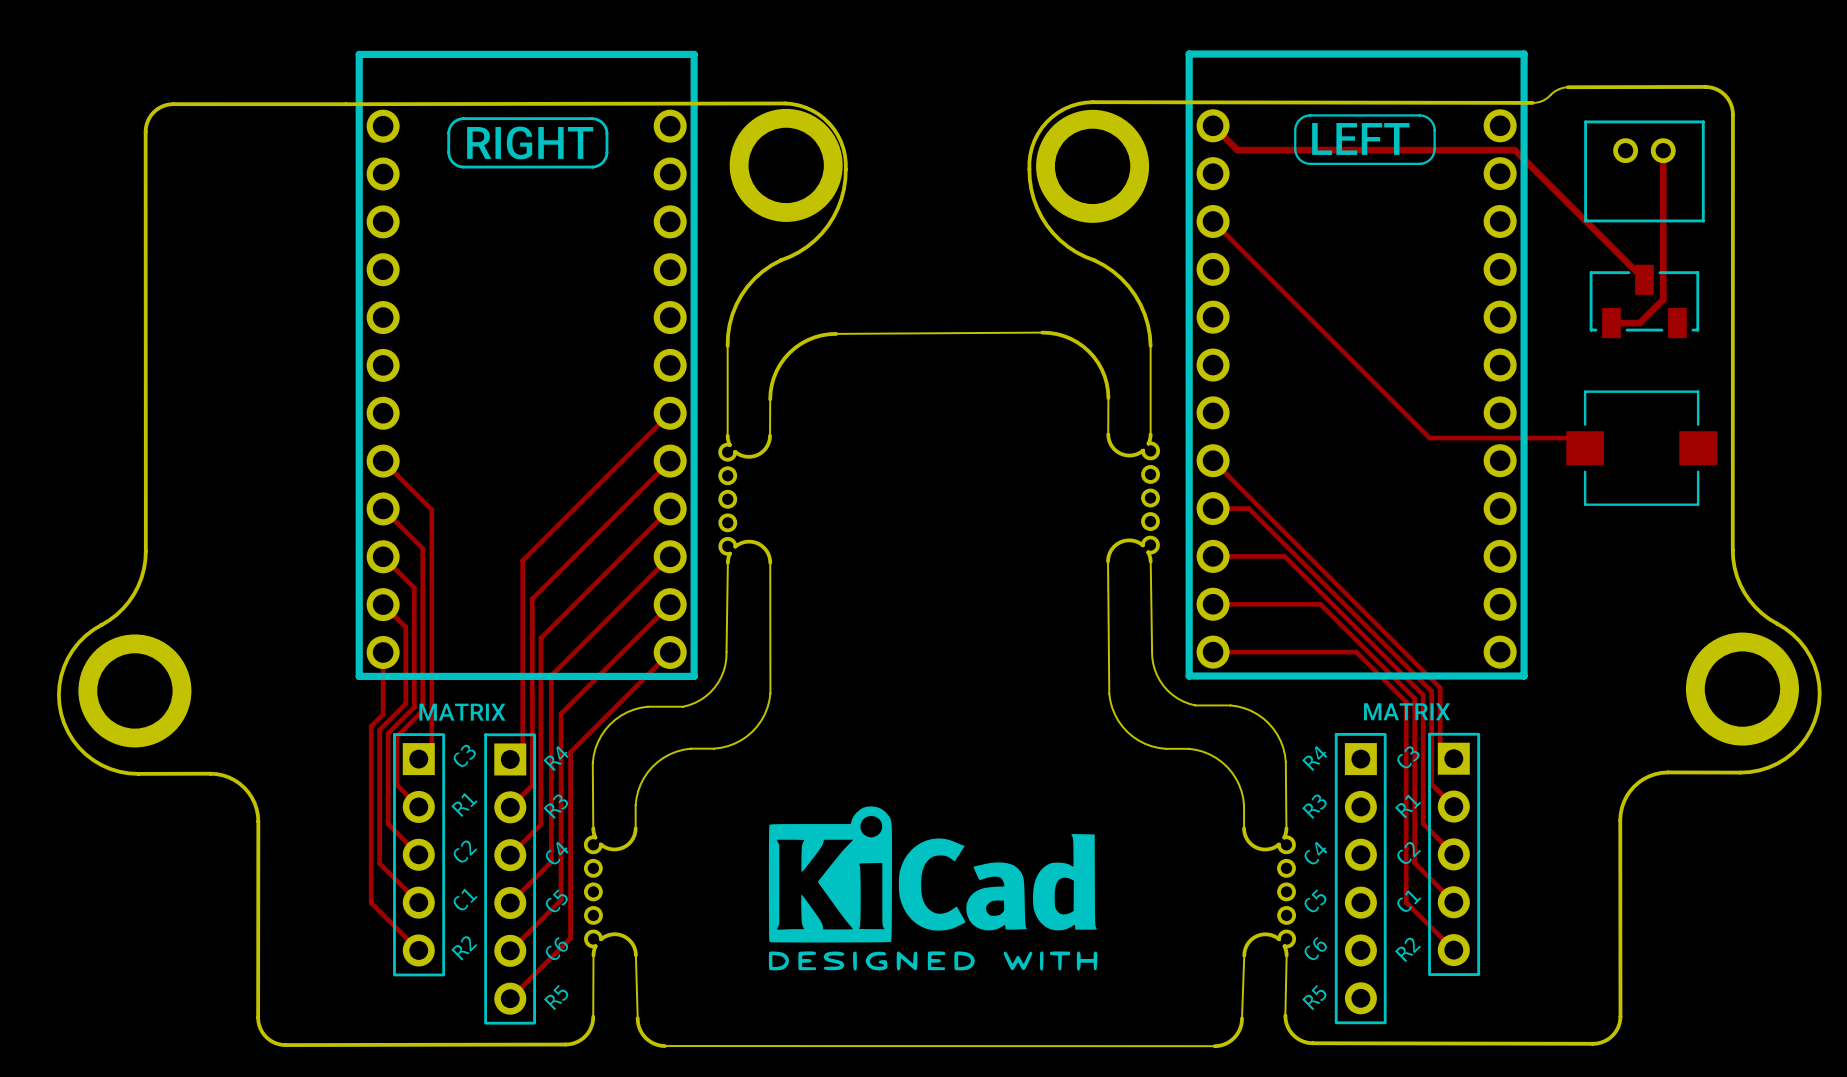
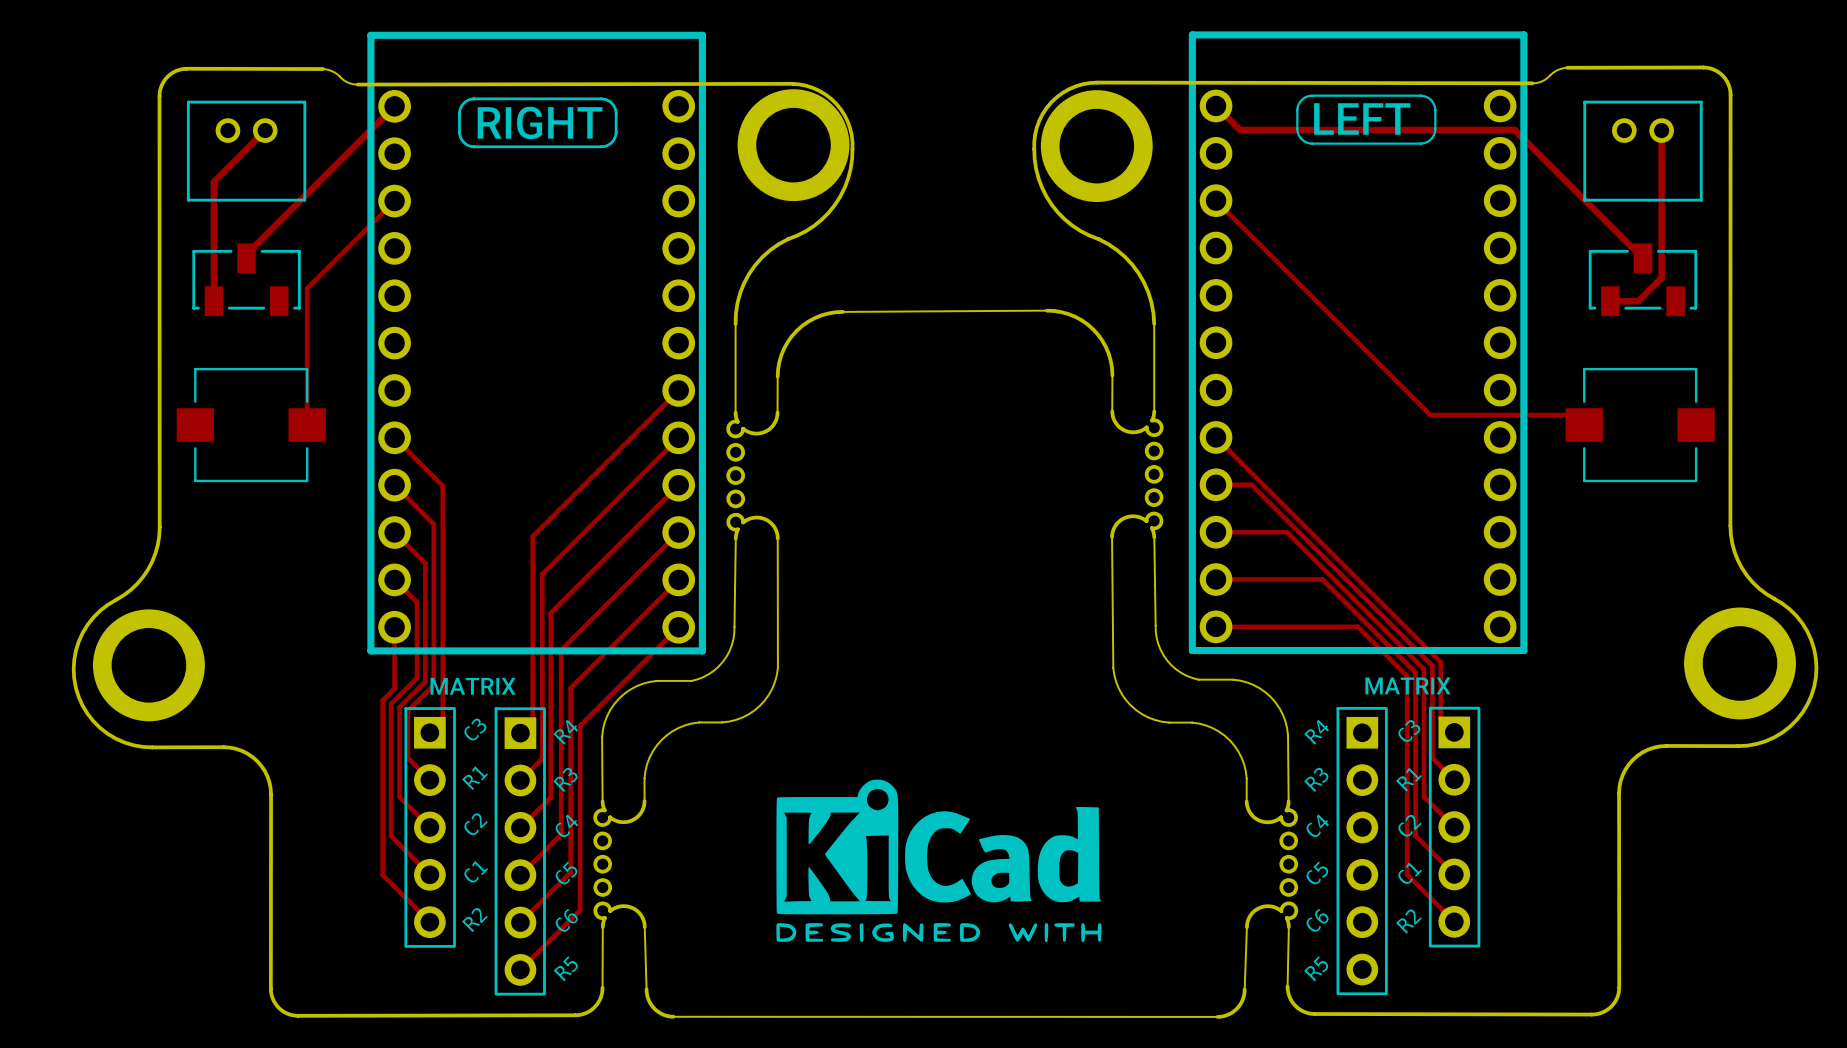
board edge: (172, 104) (162, 106) (153, 112) (147, 121) (145, 131) -> none
board edge: (173, 104) (345, 104) -> (159, 111) (159, 92) (163, 82) (173, 72) (183, 69) (323, 69) (334, 72) (347, 82) (357, 84)
track: none -> (394, 106) (246, 254) (246, 258)
track: none -> (265, 130) (213, 181) (213, 301)
part: none -> (246, 151)
track: none -> (394, 201) (307, 288) (307, 425)
part: none -> (246, 279)
part: none -> (251, 425)

